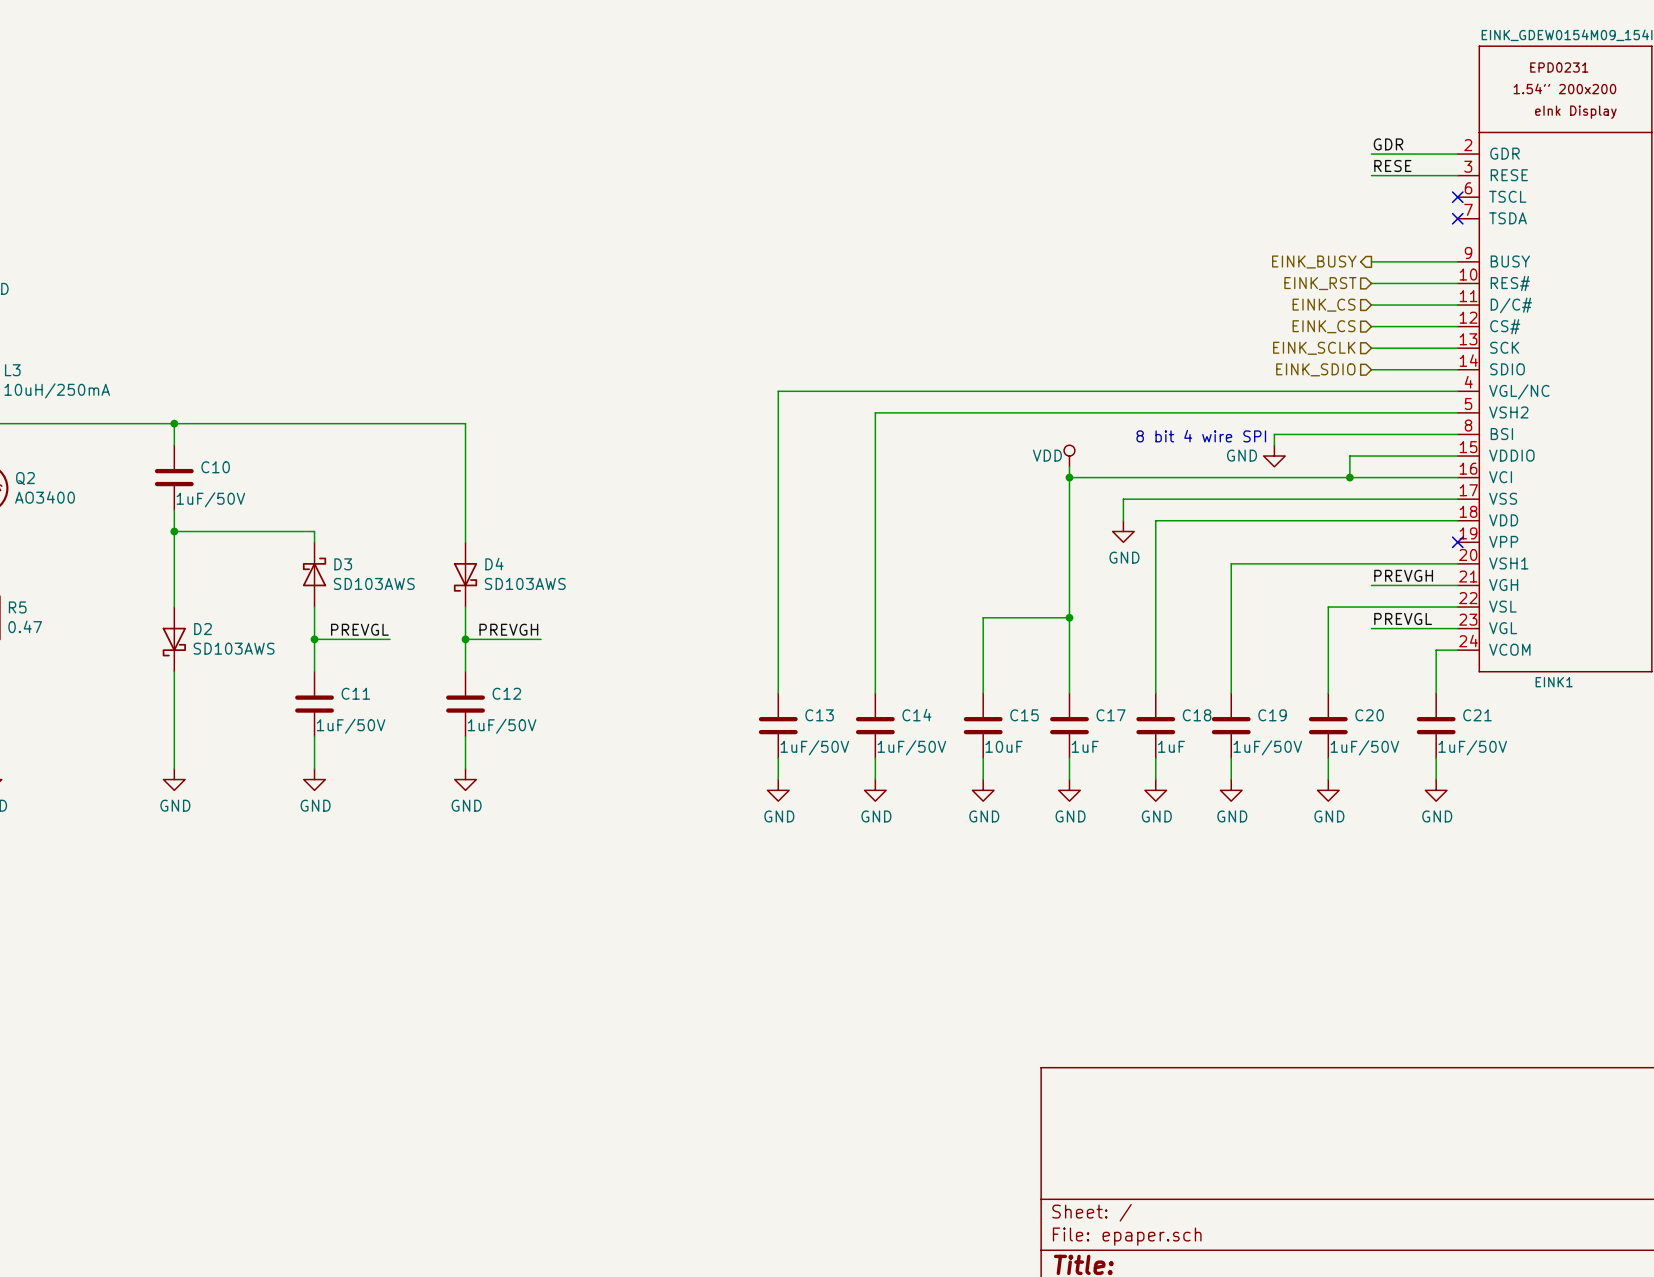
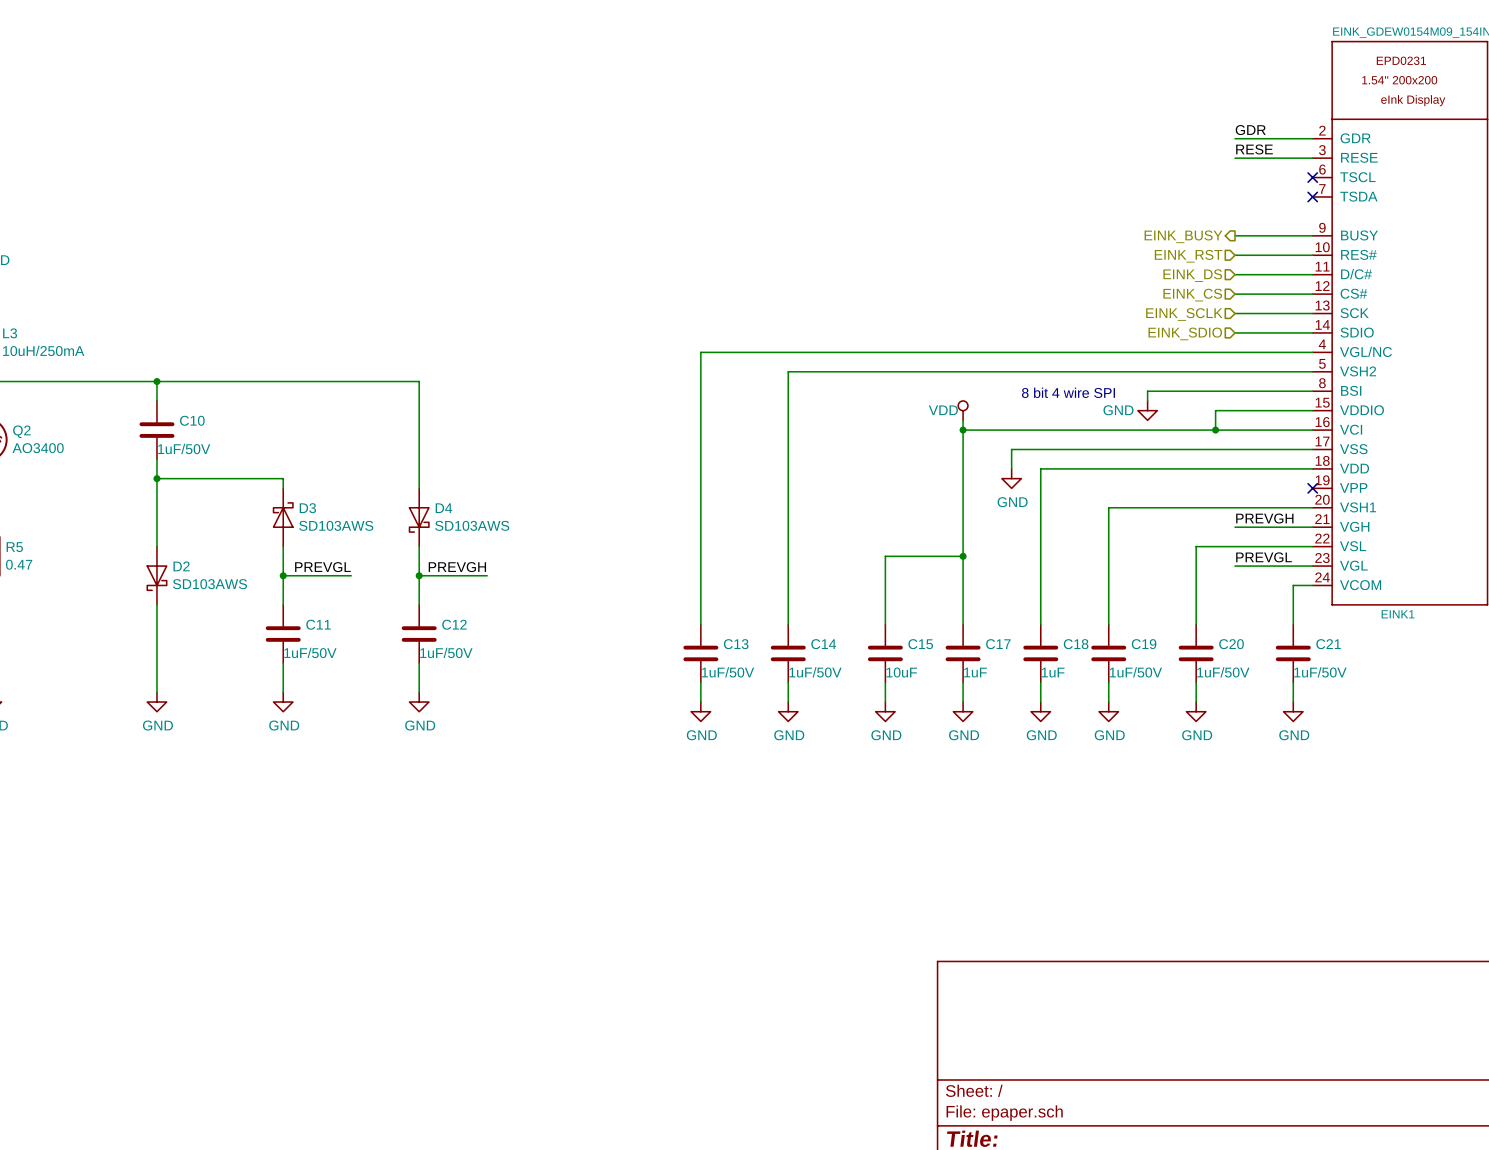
hierarchical label: EINK_CS (1324, 305) -> EINK_DS (1192, 275)

